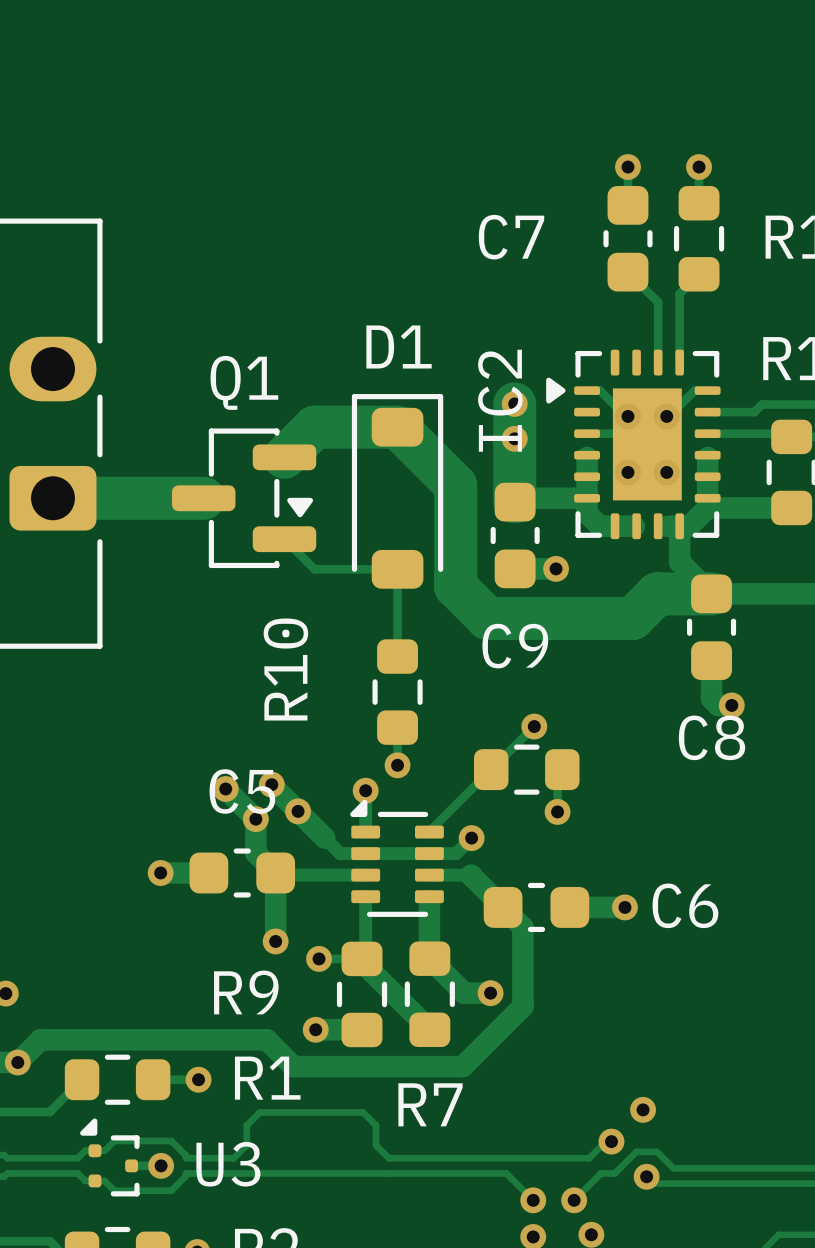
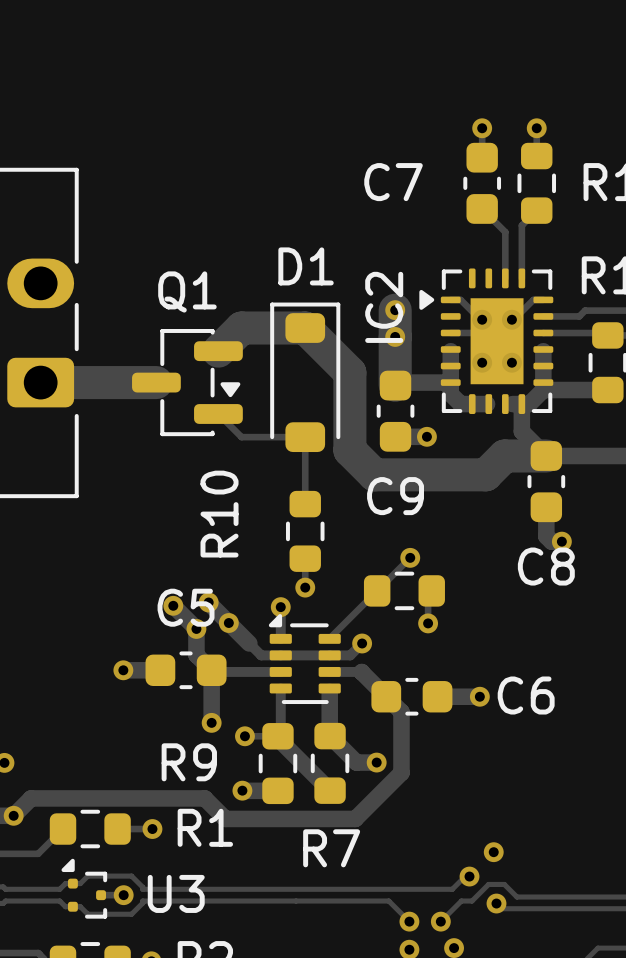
track: (233, 1158) (246, 1145) (246, 1125) (259, 1112) (363, 1112) (376, 1125) (376, 1145) (388, 1158) -> (179, 889) (298, 889)

